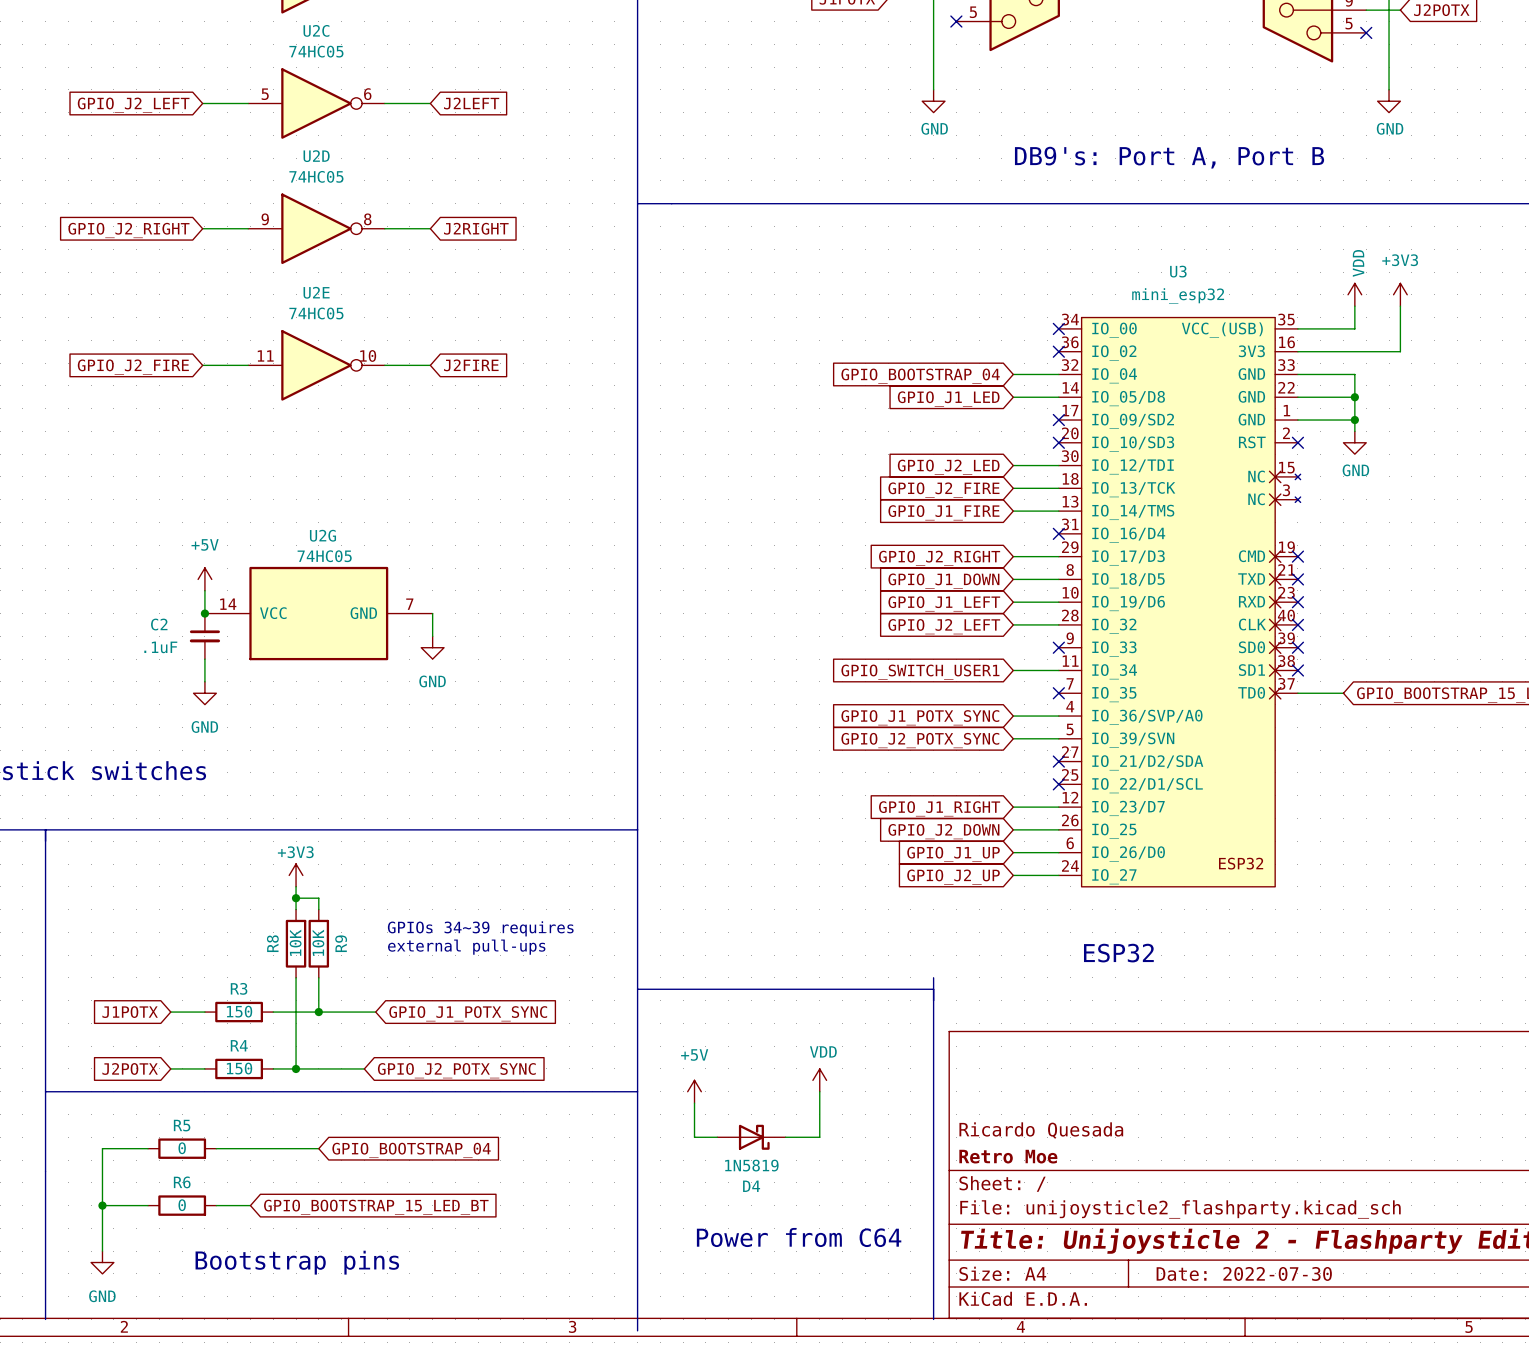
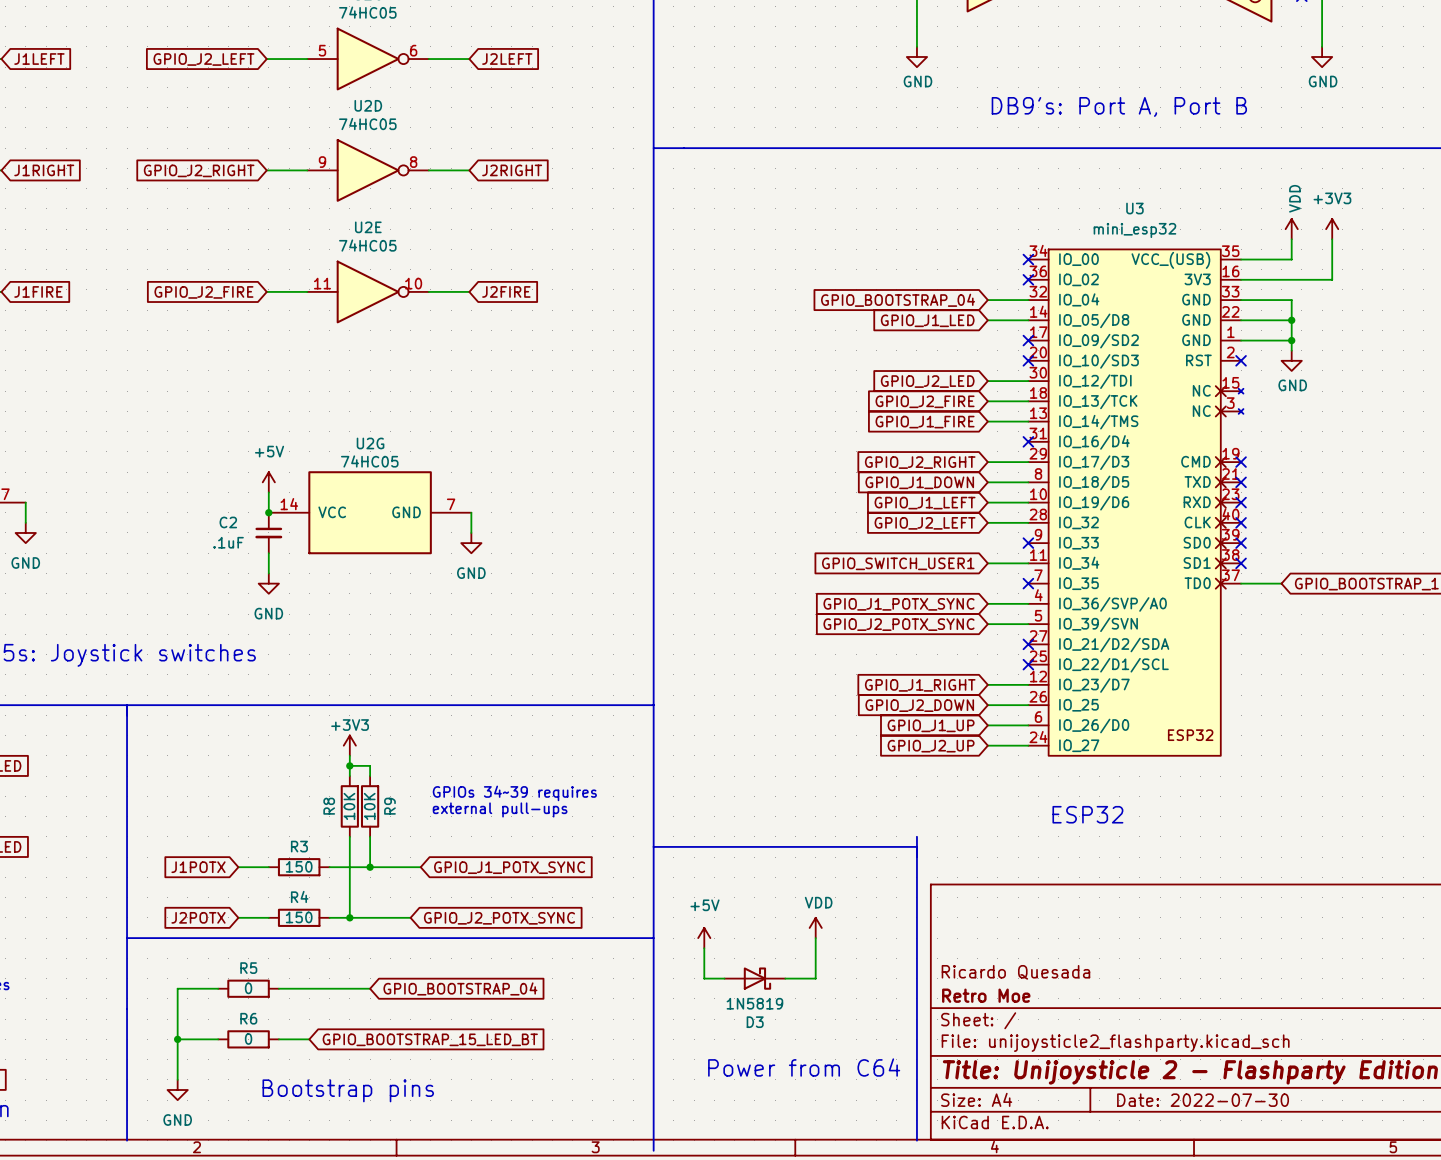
D4 name: D4 (751, 1186) -> D3 (755, 1022)

